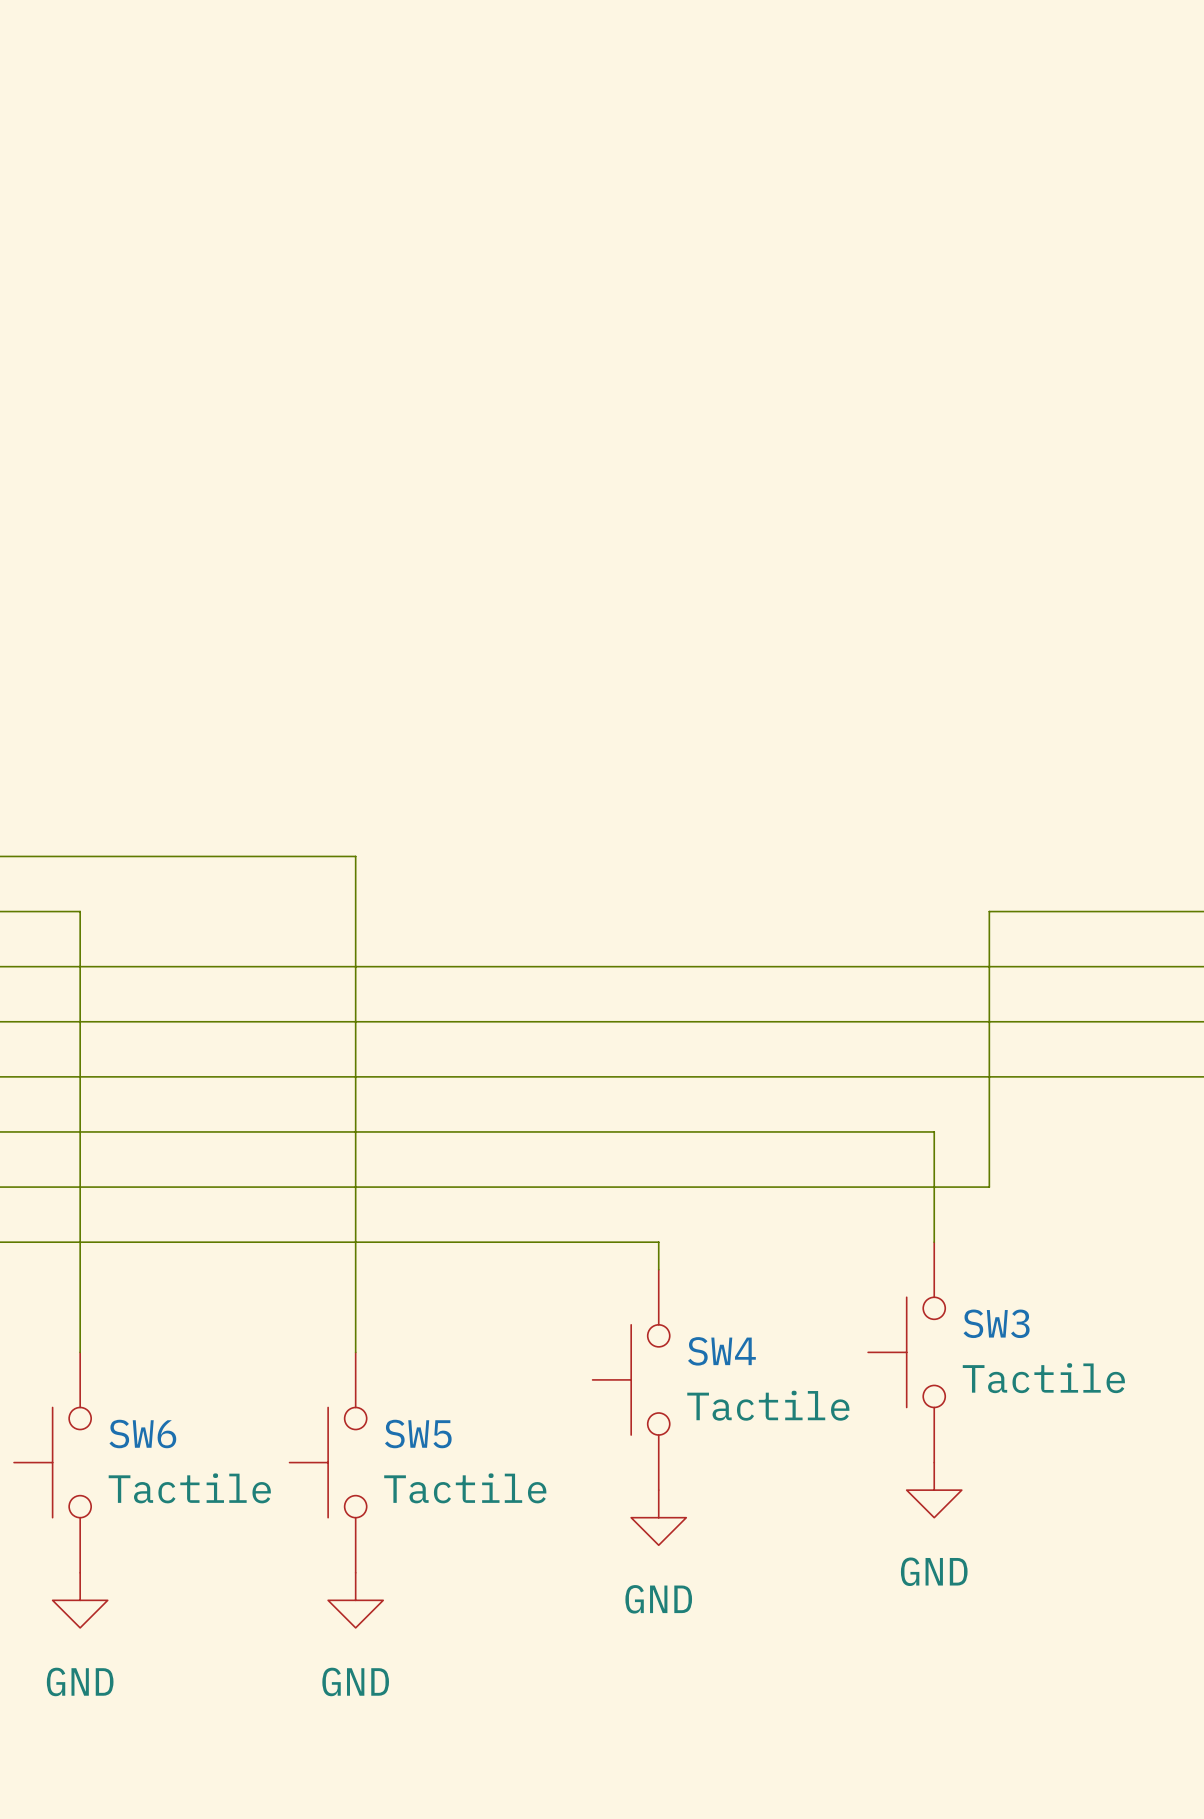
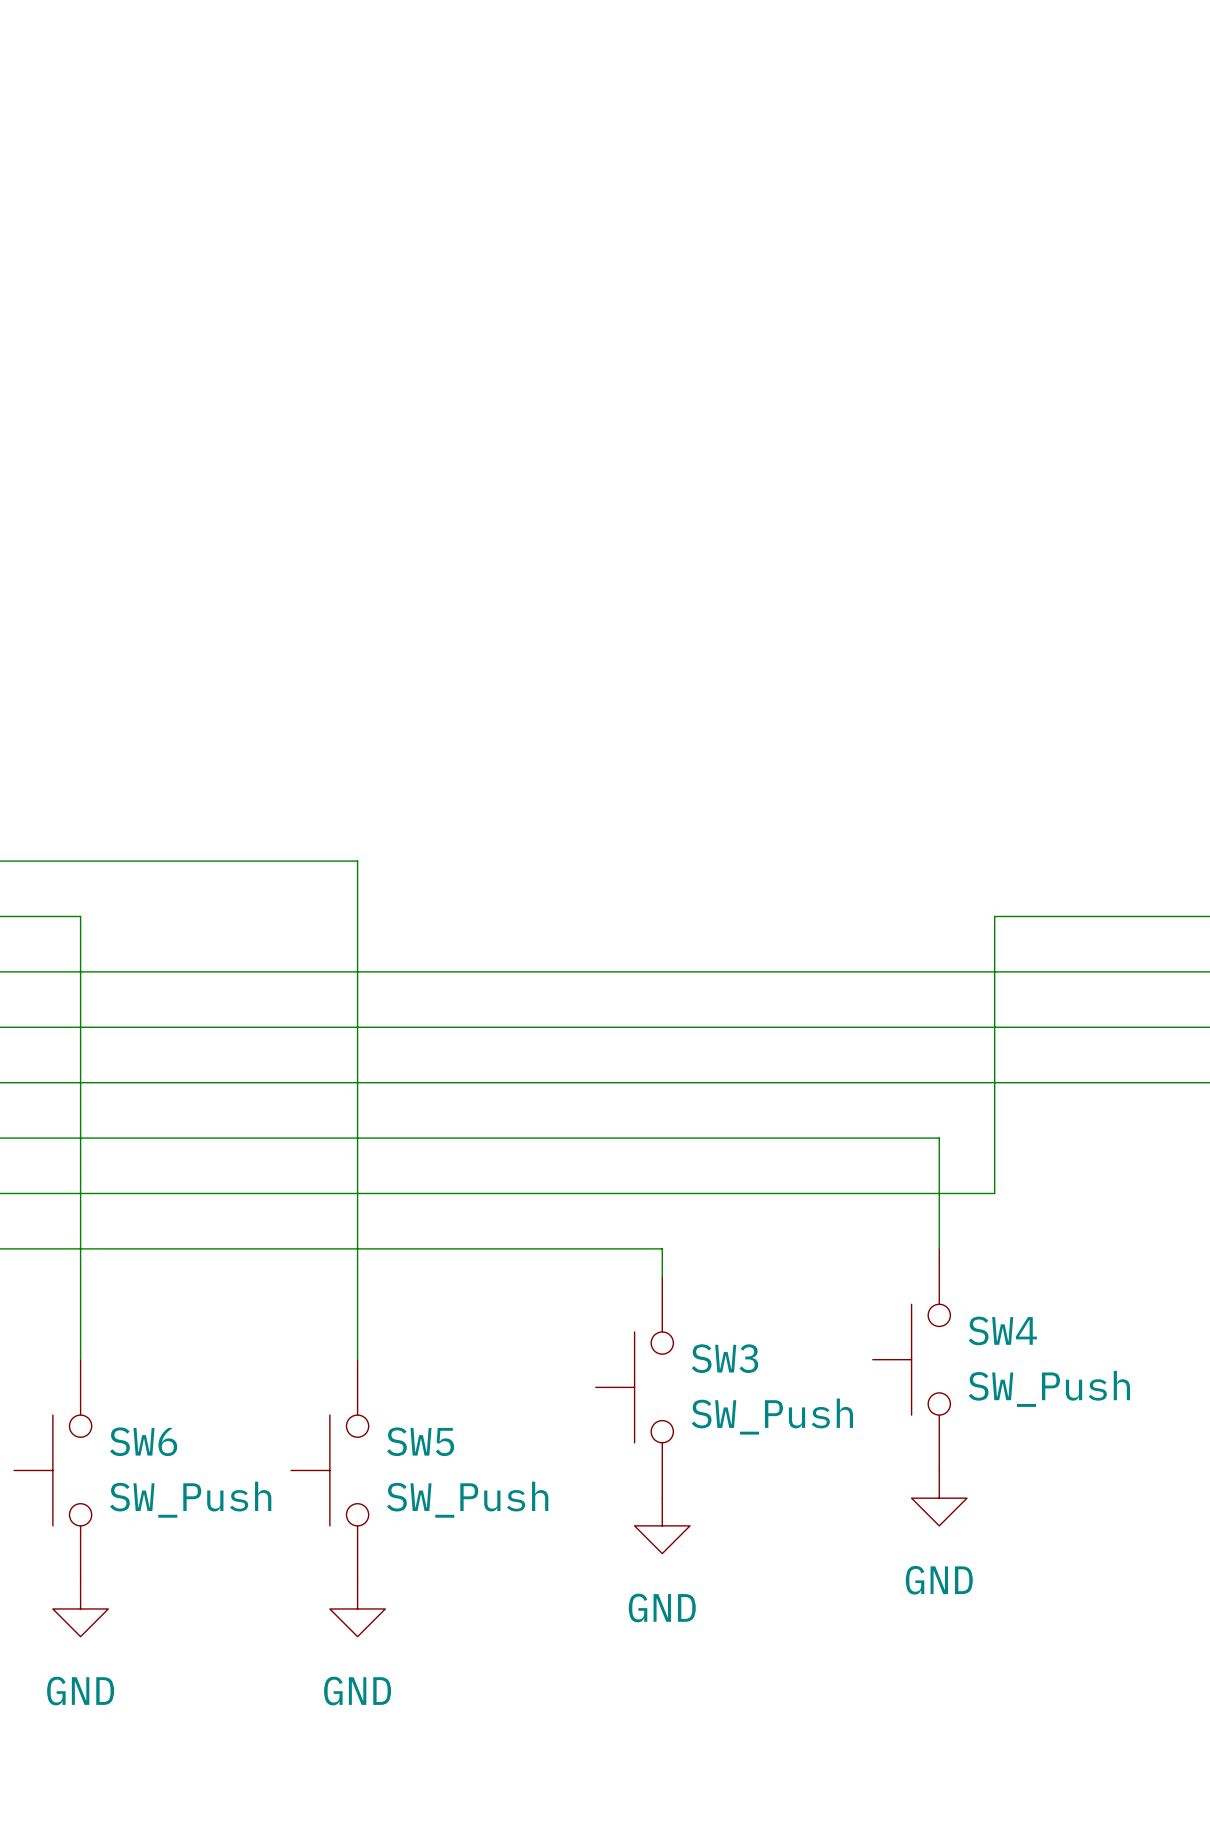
SW3 name: SW3 (996, 1323) -> SW4 (1002, 1330)
SW4 name: SW4 (721, 1351) -> SW3 (724, 1358)
SW3 value: Tactile (1043, 1378) -> SW_Push (1049, 1388)
SW4 value: Tactile (768, 1405) -> SW_Push (772, 1416)
SW6 value: Tactile (189, 1488) -> SW_Push (190, 1499)
SW5 value: Tactile (465, 1488) -> SW_Push (467, 1499)

